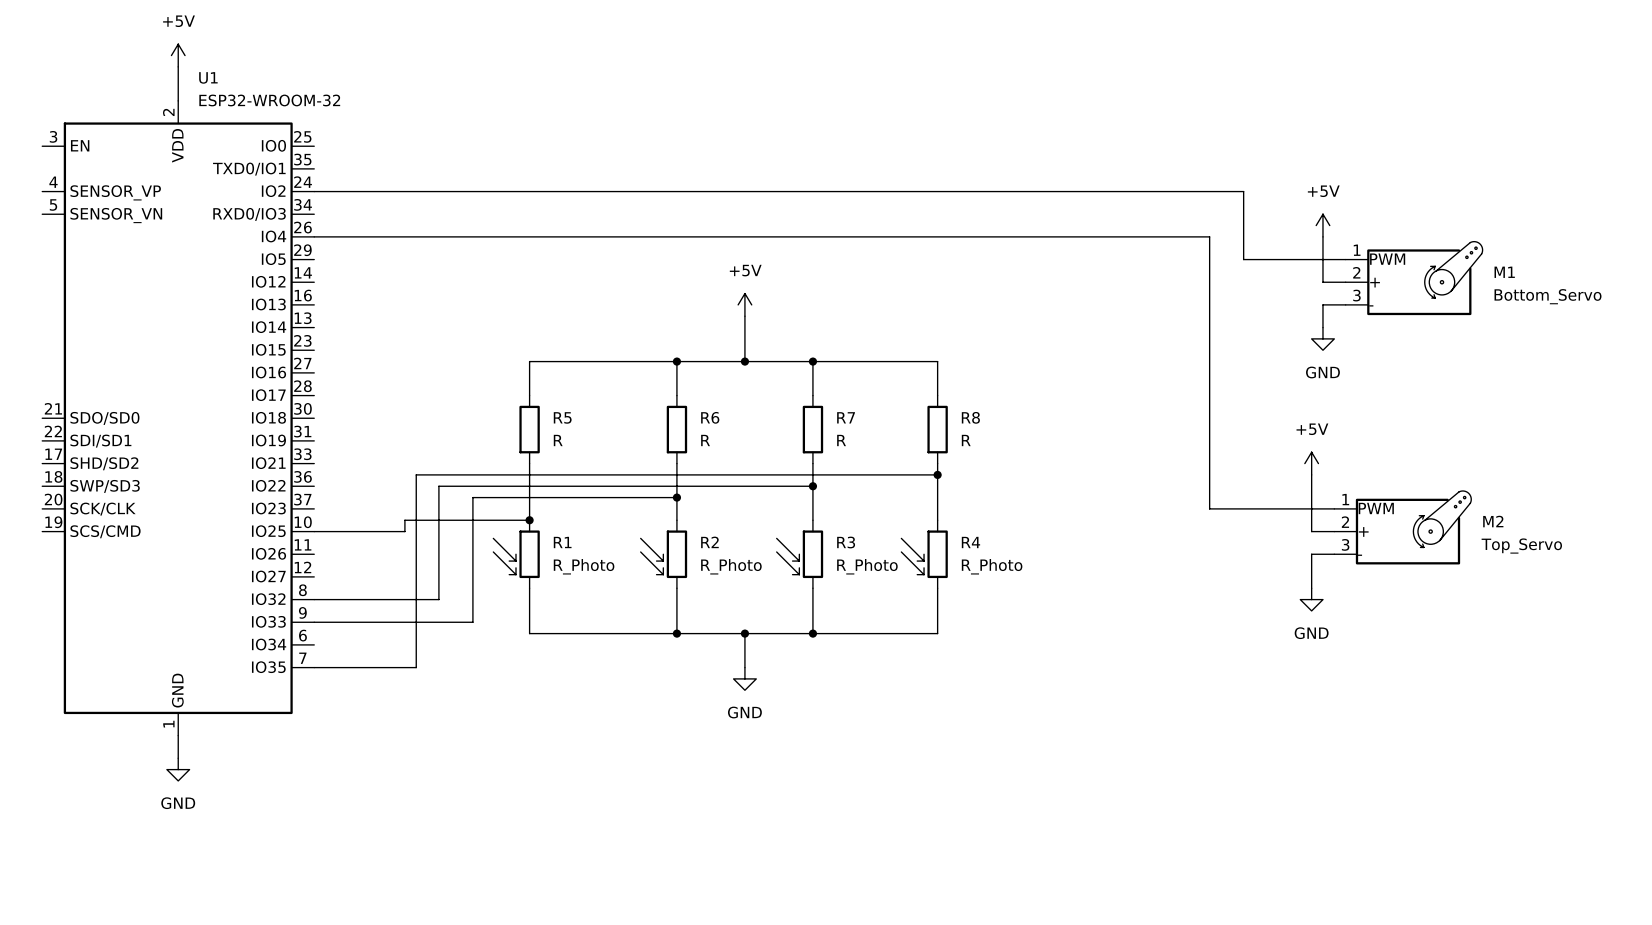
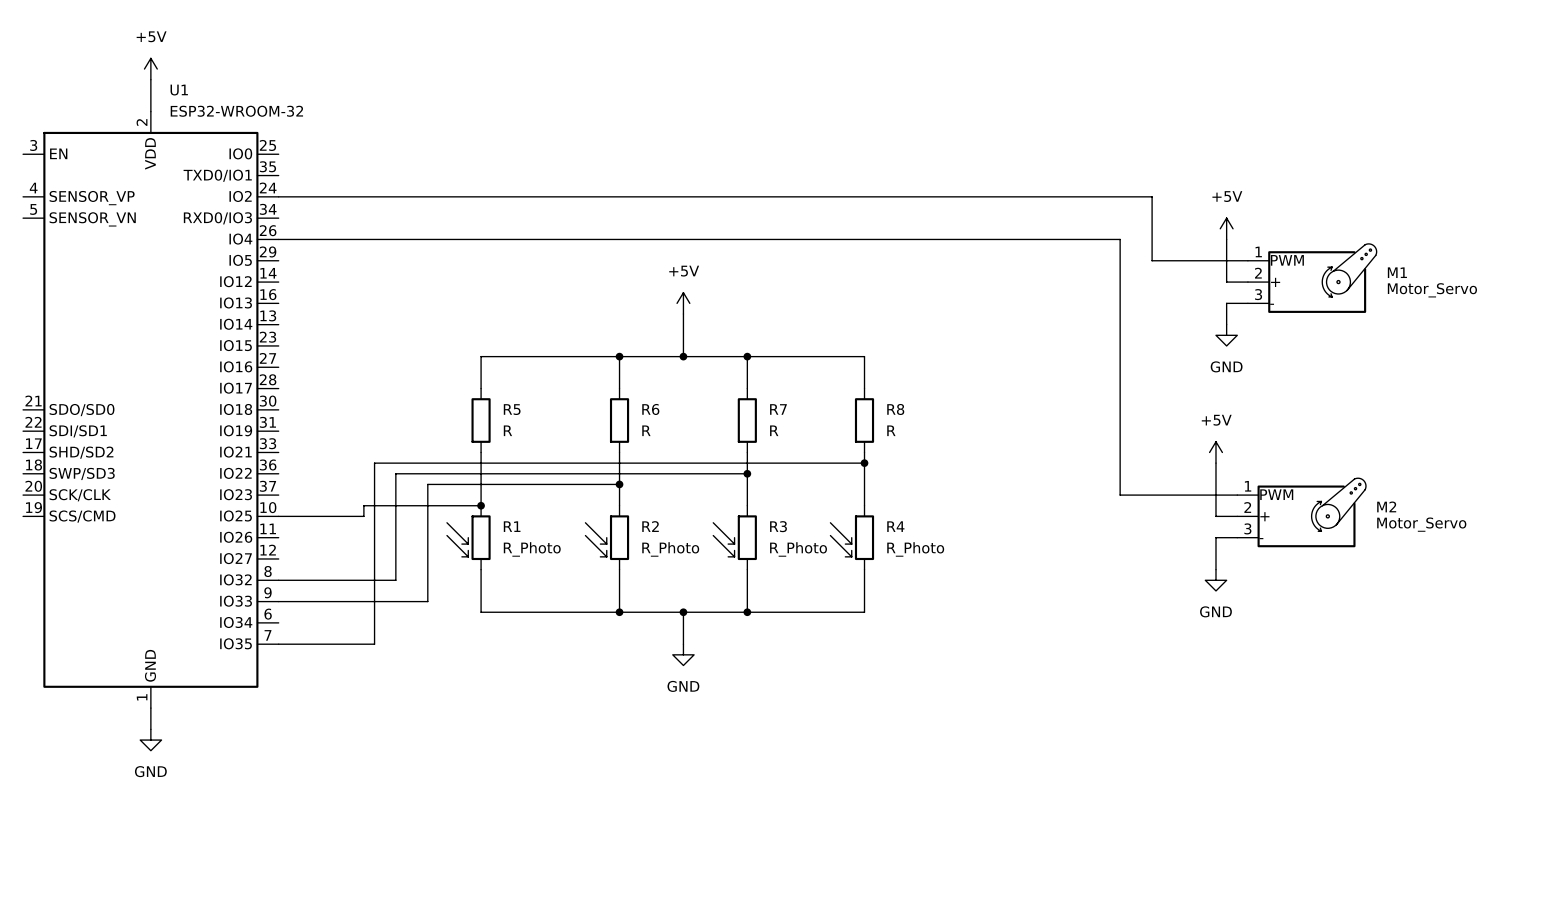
M1 value: Bottom_Servo (1548, 296) -> Motor_Servo (1432, 290)
M2 value: Top_Servo (1521, 546) -> Motor_Servo (1421, 524)

